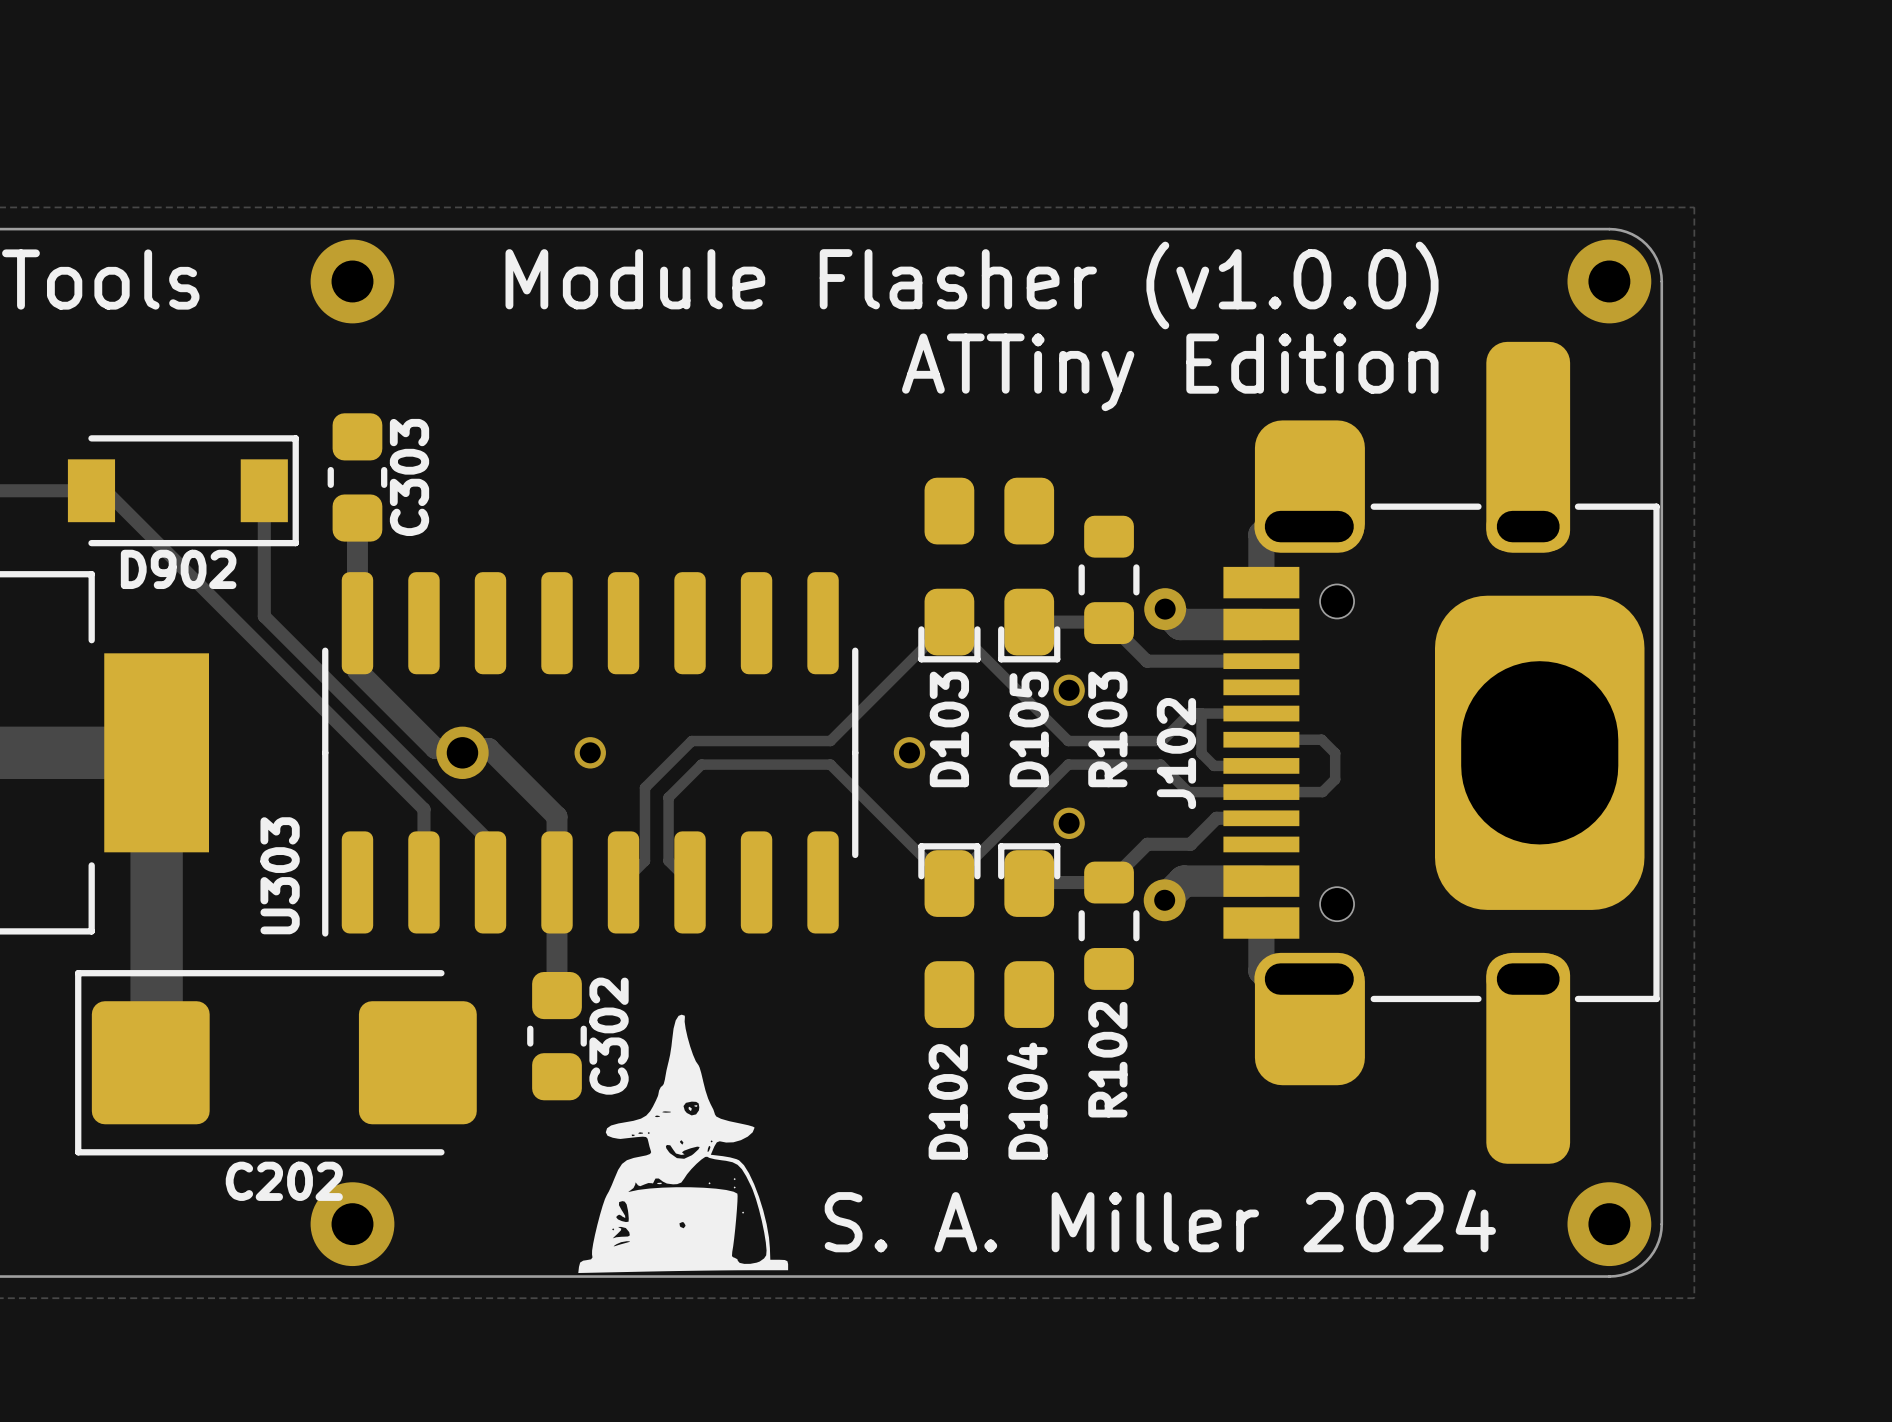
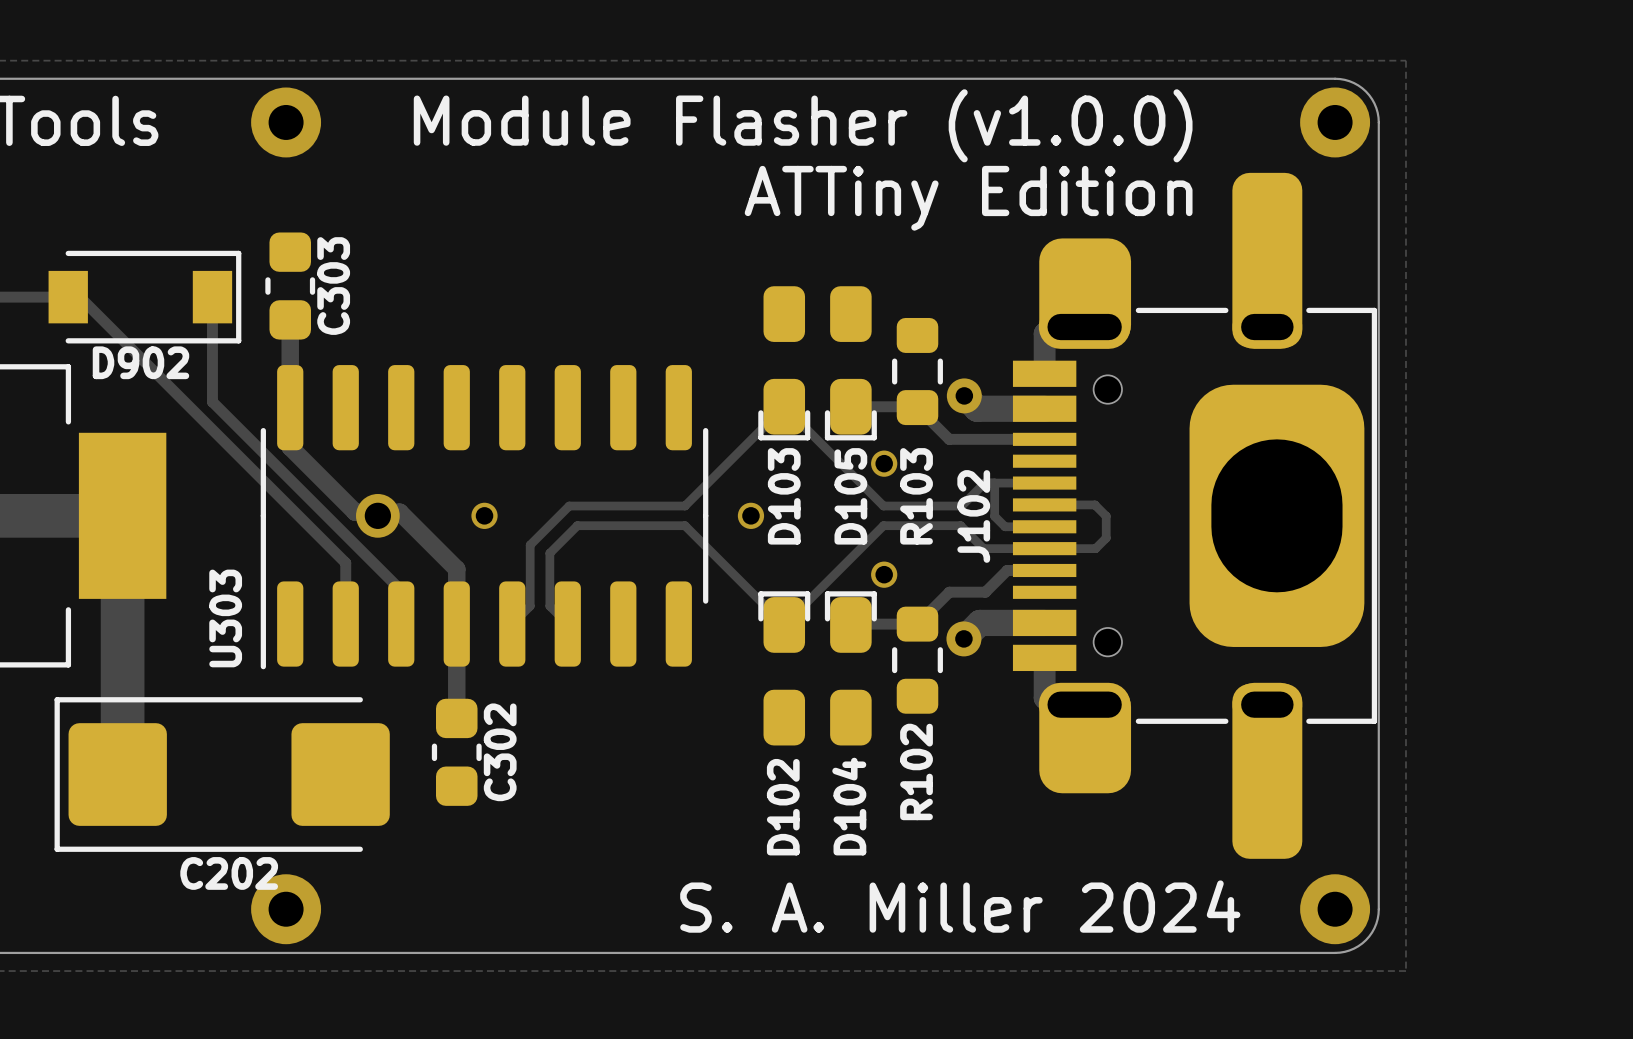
drawing: [578, 1014, 789, 1274] -> none

